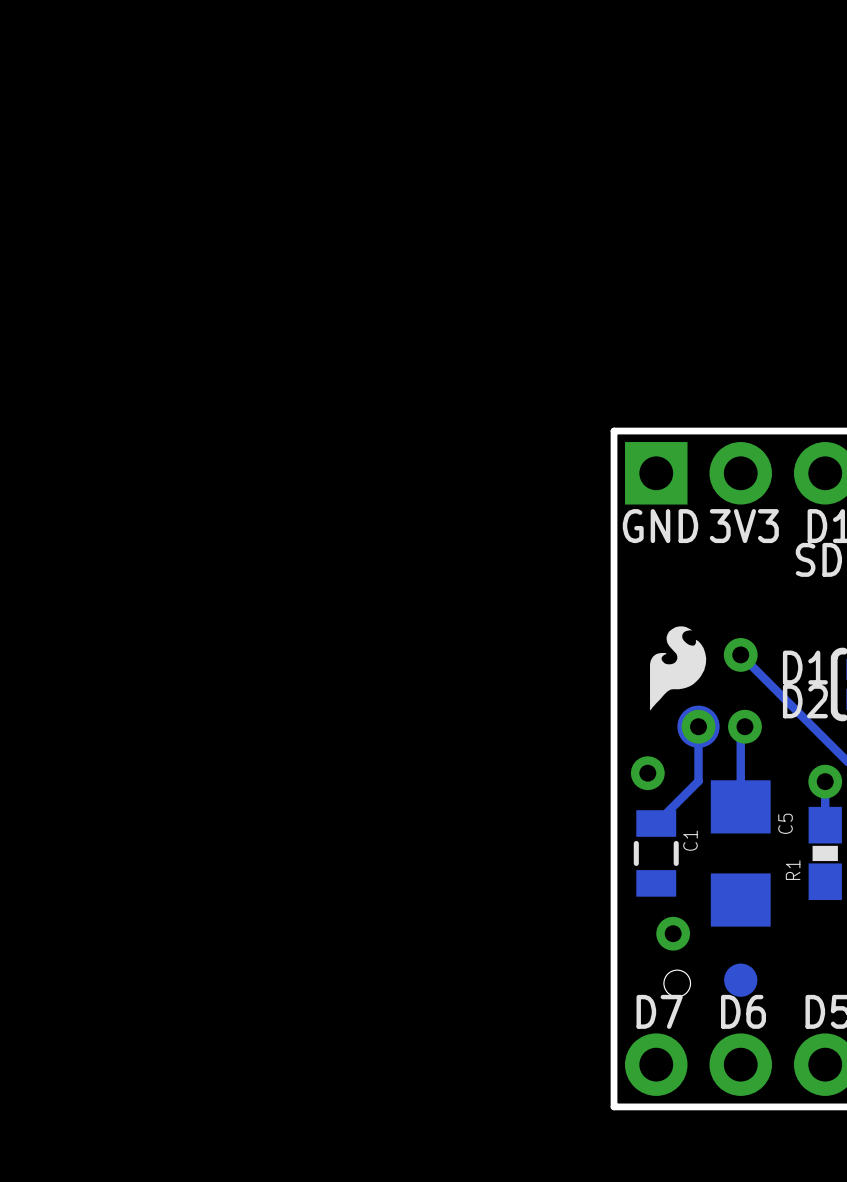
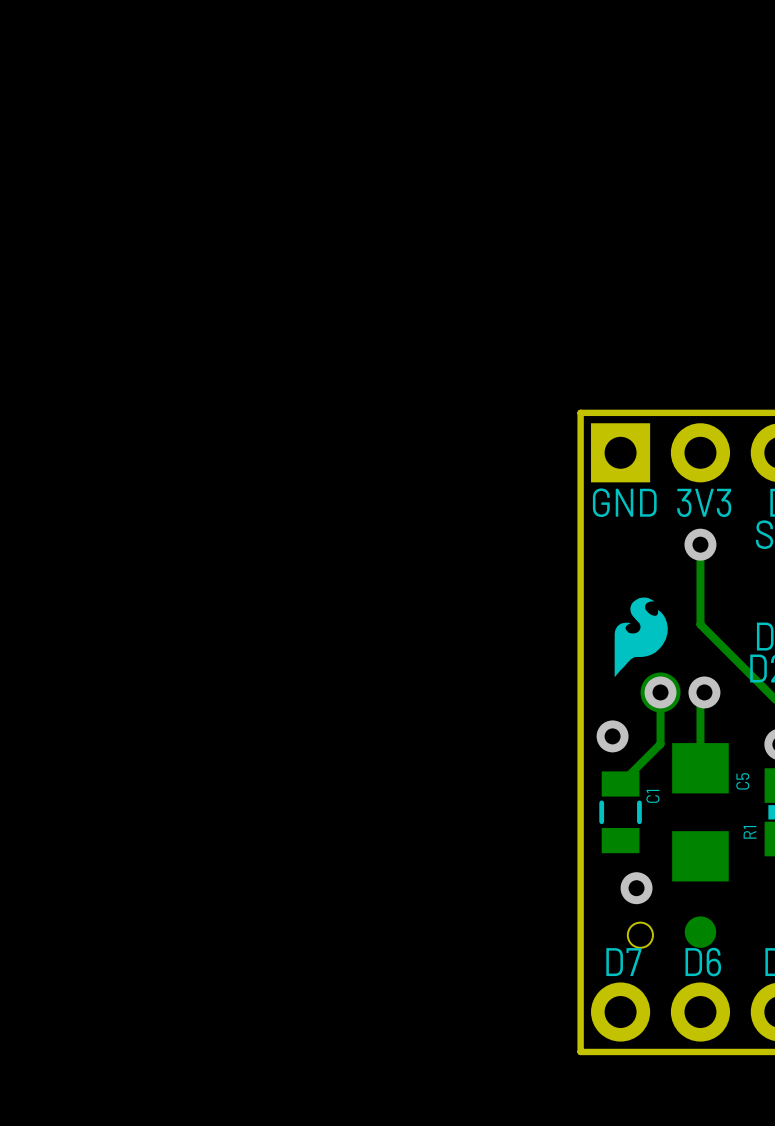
track: none -> (700, 544) (700, 624)
via: none -> (700, 544)
via: (740, 654) -> none

